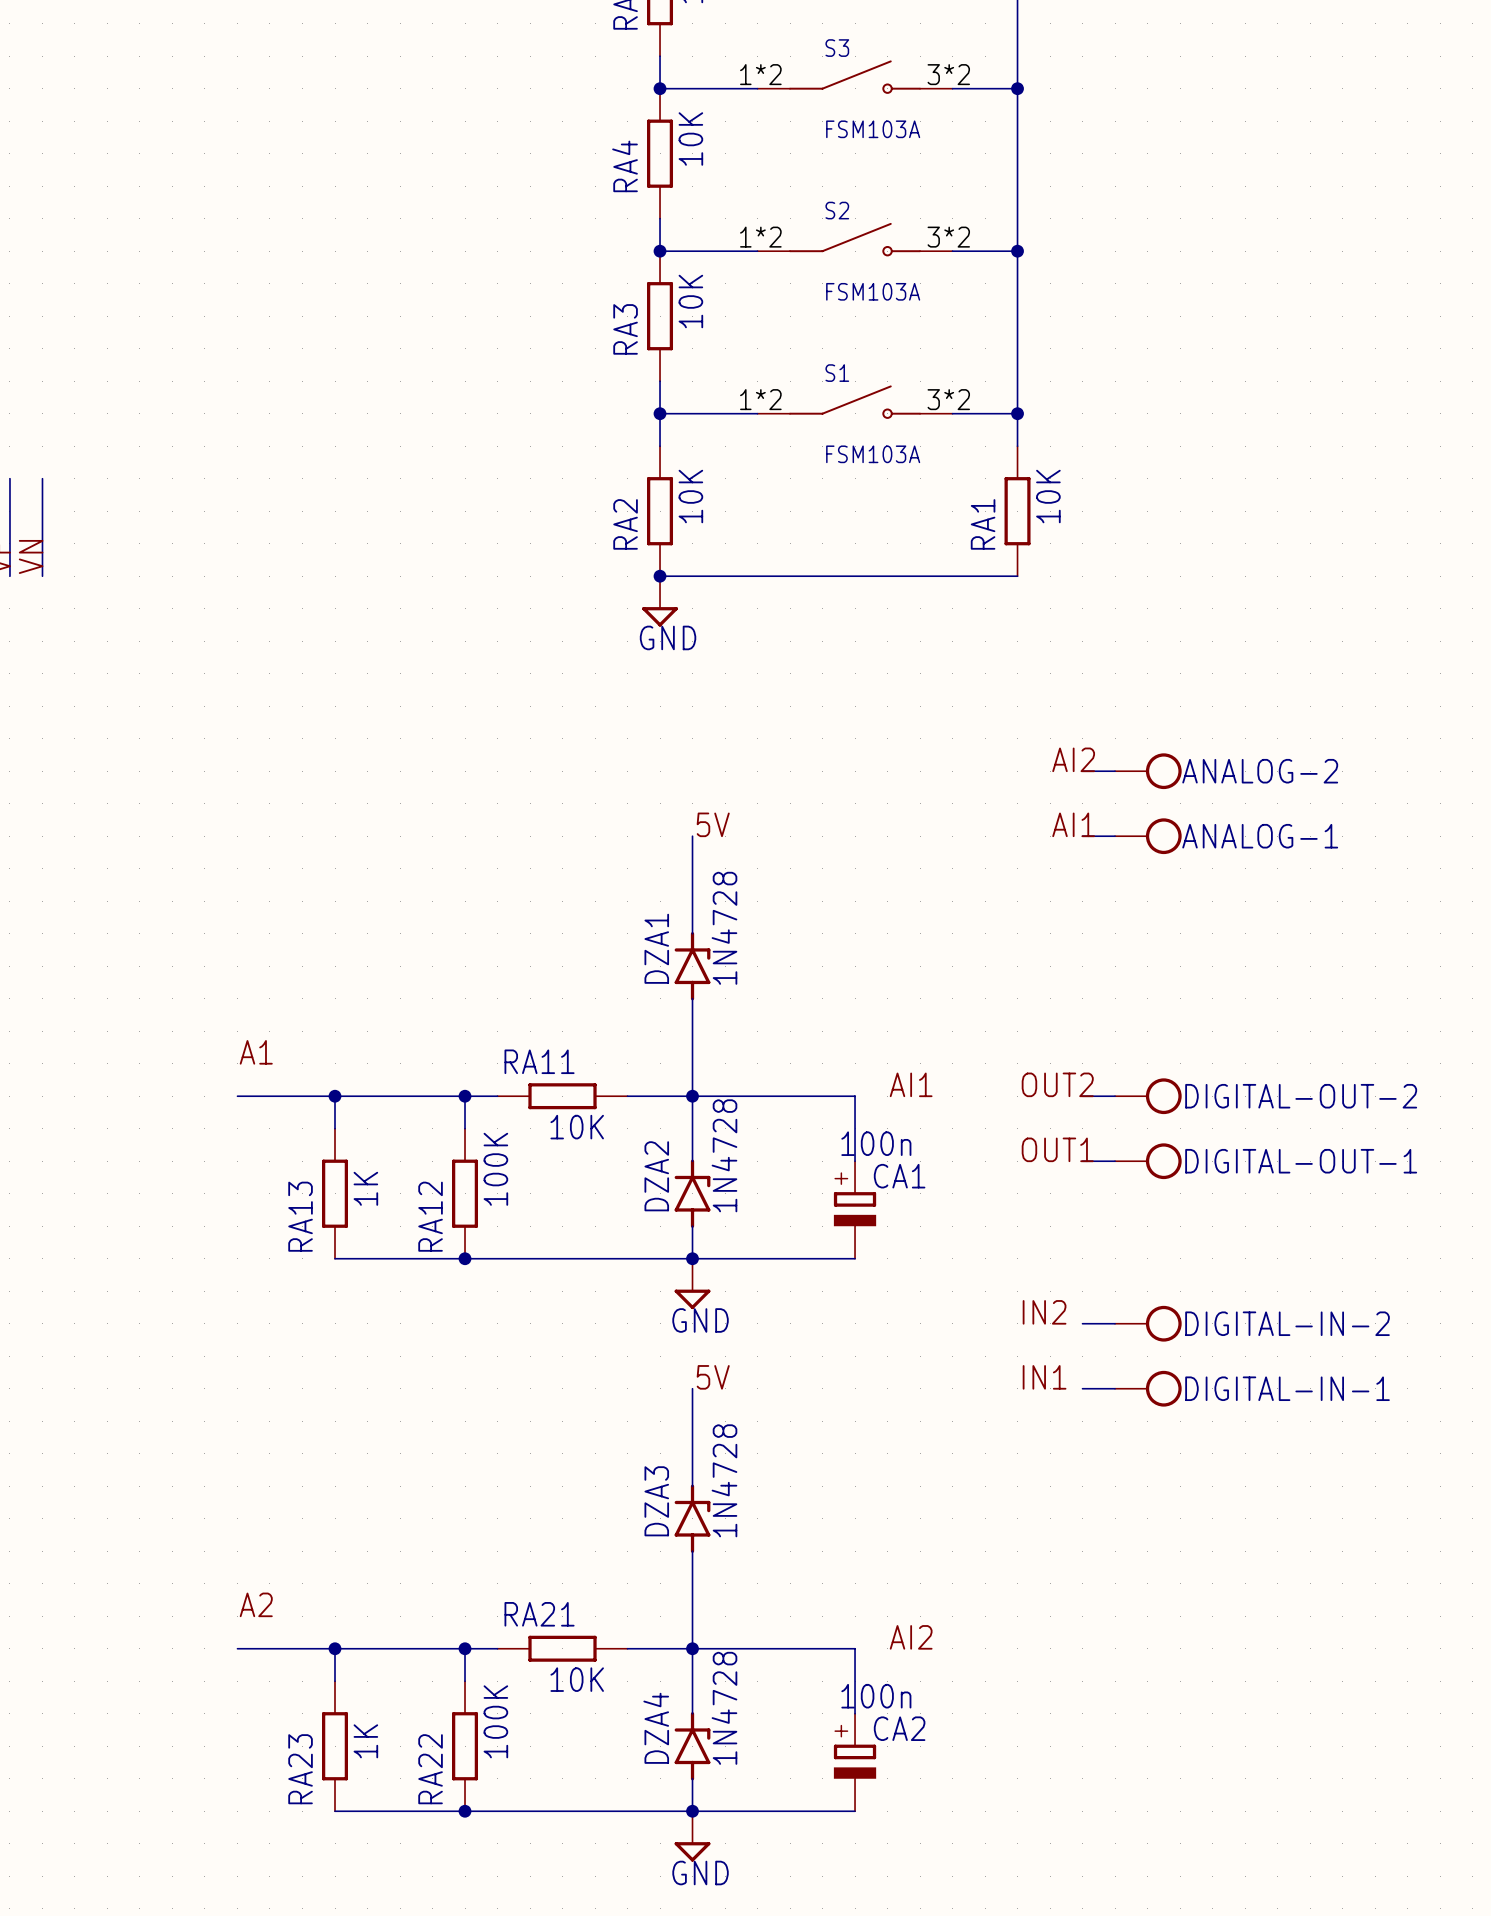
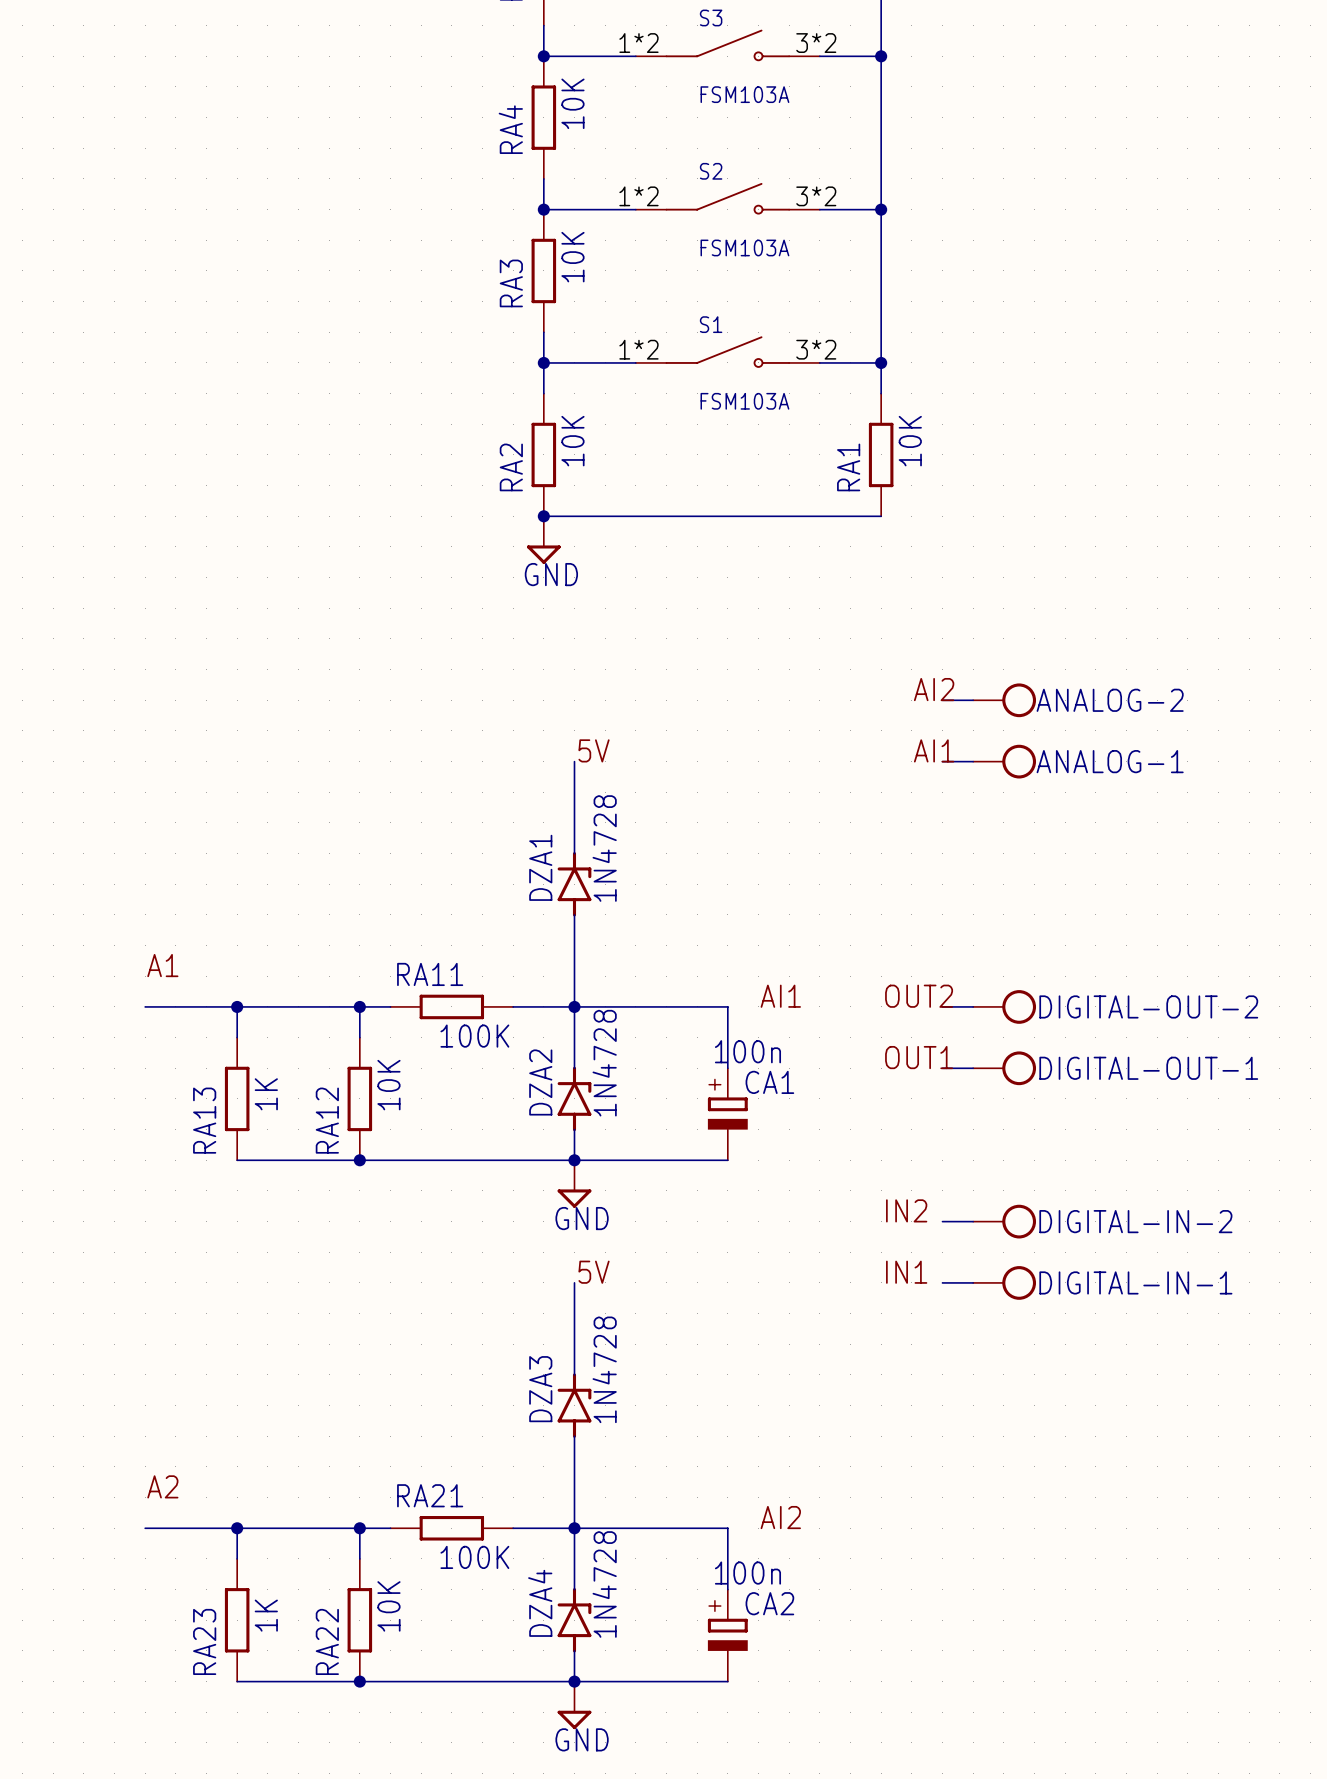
RA11 value: 10K (577, 1127) -> 100K (474, 1036)
RA12 value: 100K (495, 1169) -> 10K (388, 1085)
RA21 value: 10K (577, 1679) -> 100K (474, 1557)
RA22 value: 100K (495, 1721) -> 10K (388, 1606)

